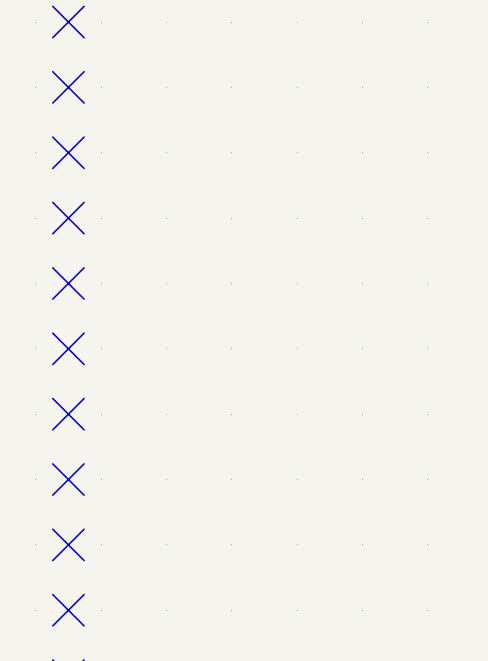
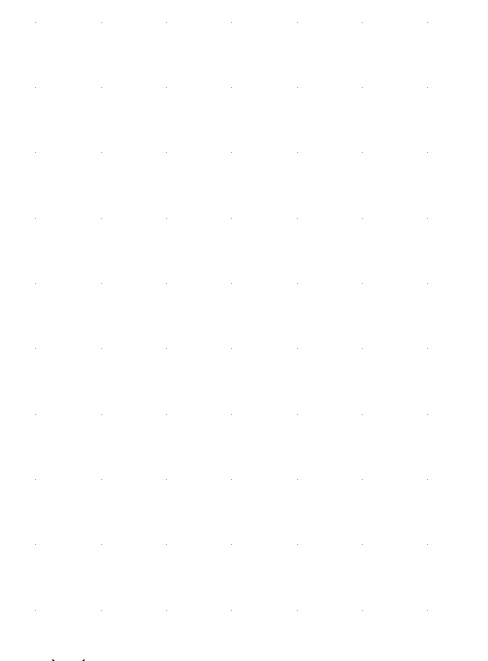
no-connect mark: (68, 22) -> none
no-connect mark: (68, 87) -> none
no-connect mark: (68, 152) -> none
no-connect mark: (68, 218) -> none
no-connect mark: (68, 283) -> none
no-connect mark: (68, 348) -> none
no-connect mark: (68, 414) -> none
no-connect mark: (68, 479) -> none
no-connect mark: (68, 544) -> none
no-connect mark: (68, 610) -> none

